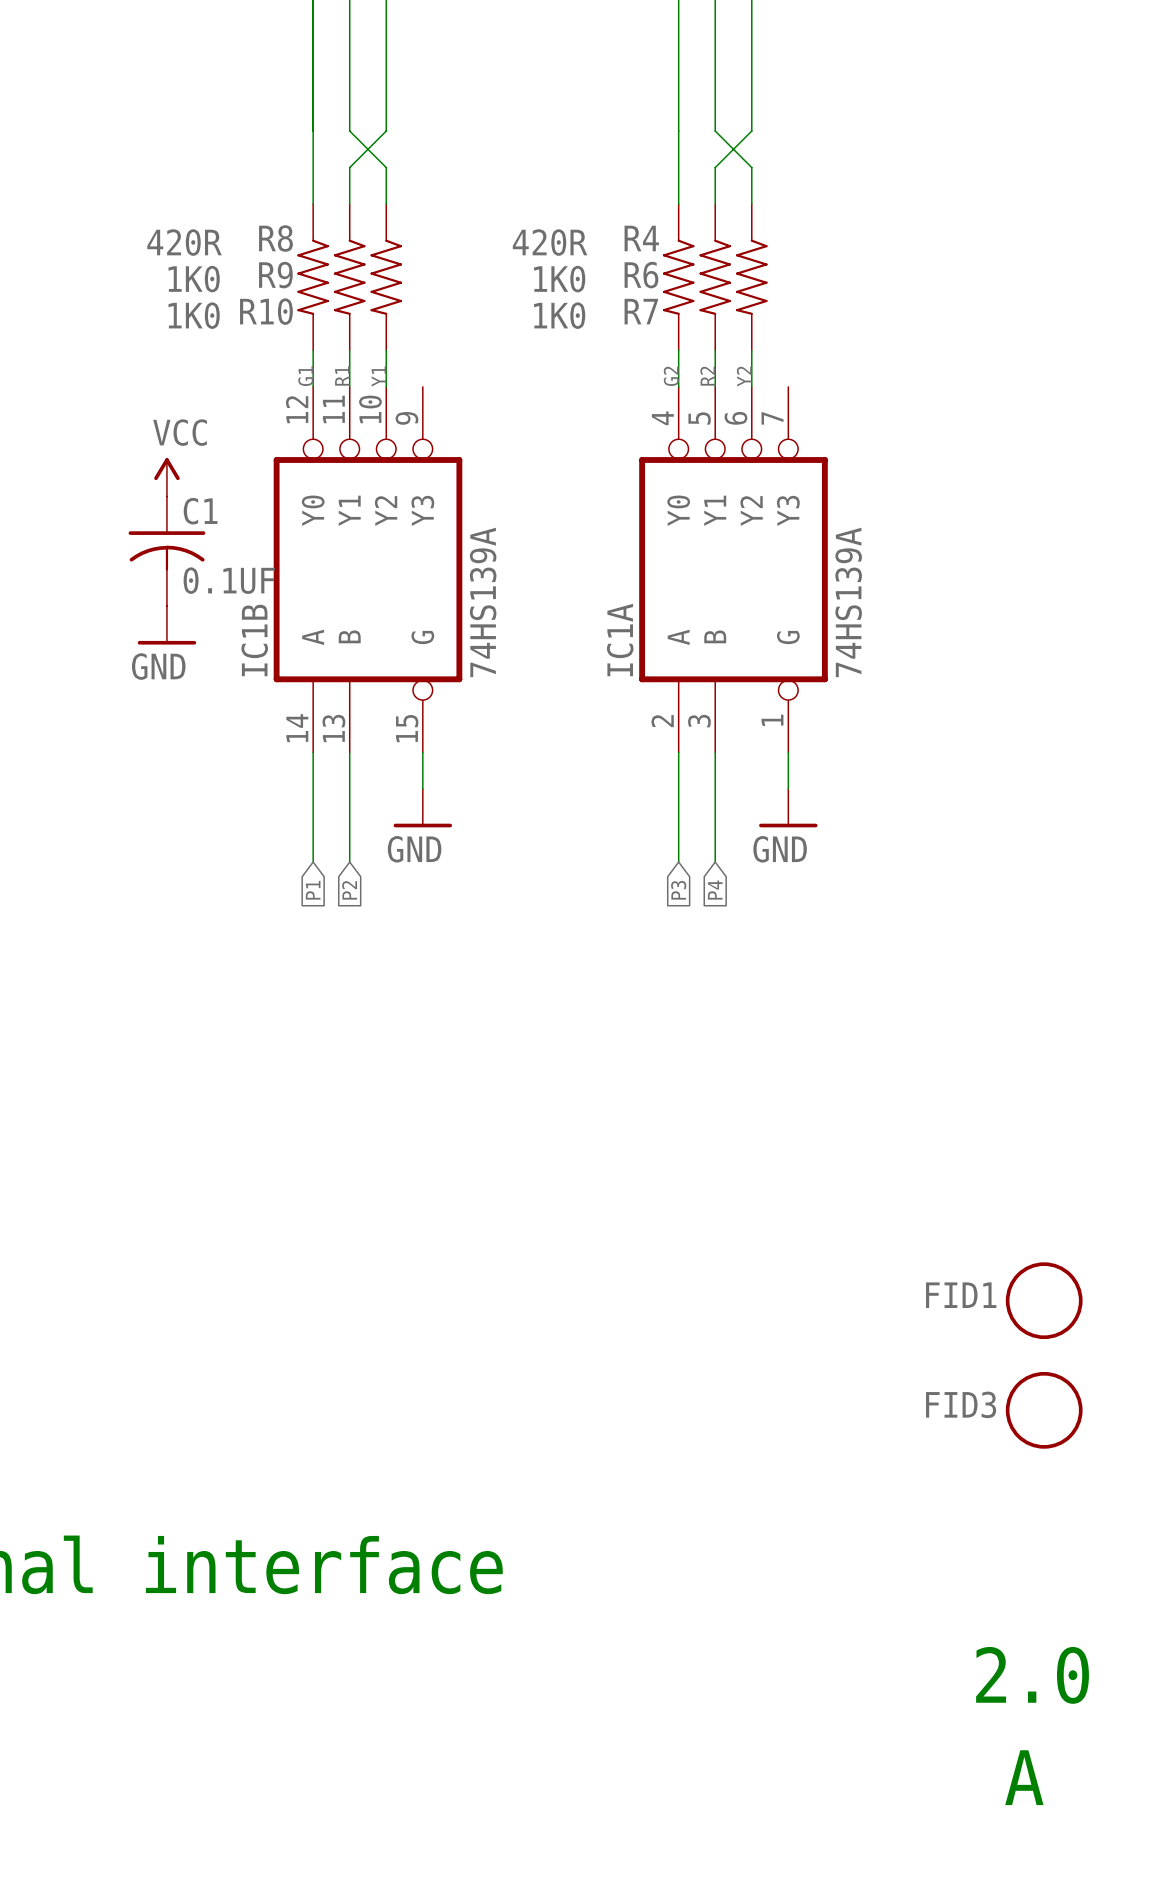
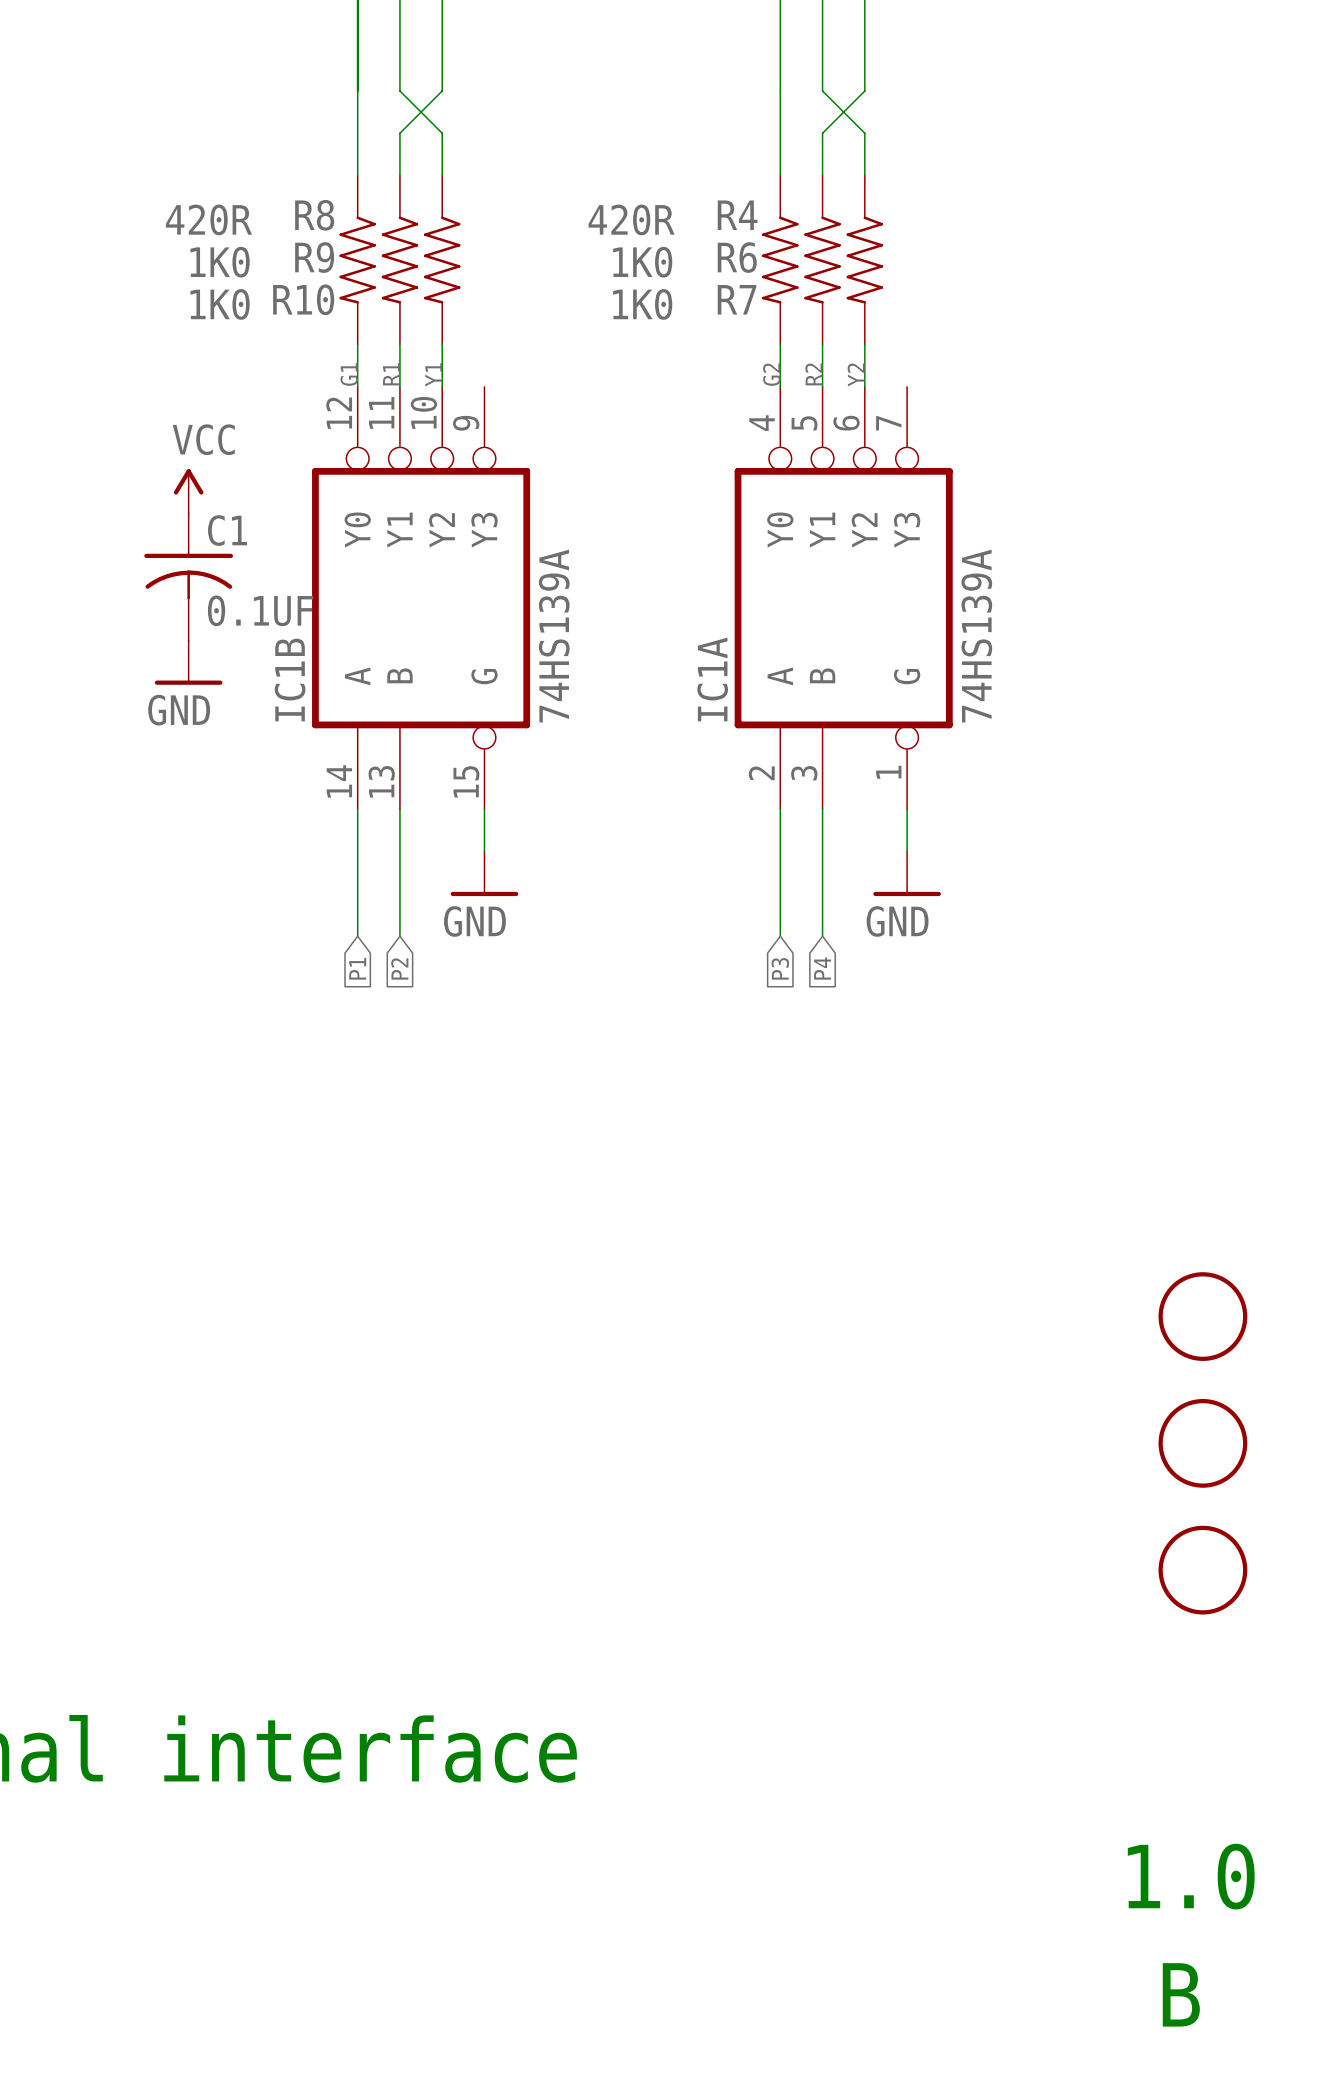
part: none -> (1202, 1316)
FID1 name: FID1 (961, 1295) -> none
FID3 name: FID3 (961, 1404) -> none
text: 2.0 (1032, 1675) -> 1.0 (1191, 1876)
text: A (1024, 1777) -> B (1181, 1994)

